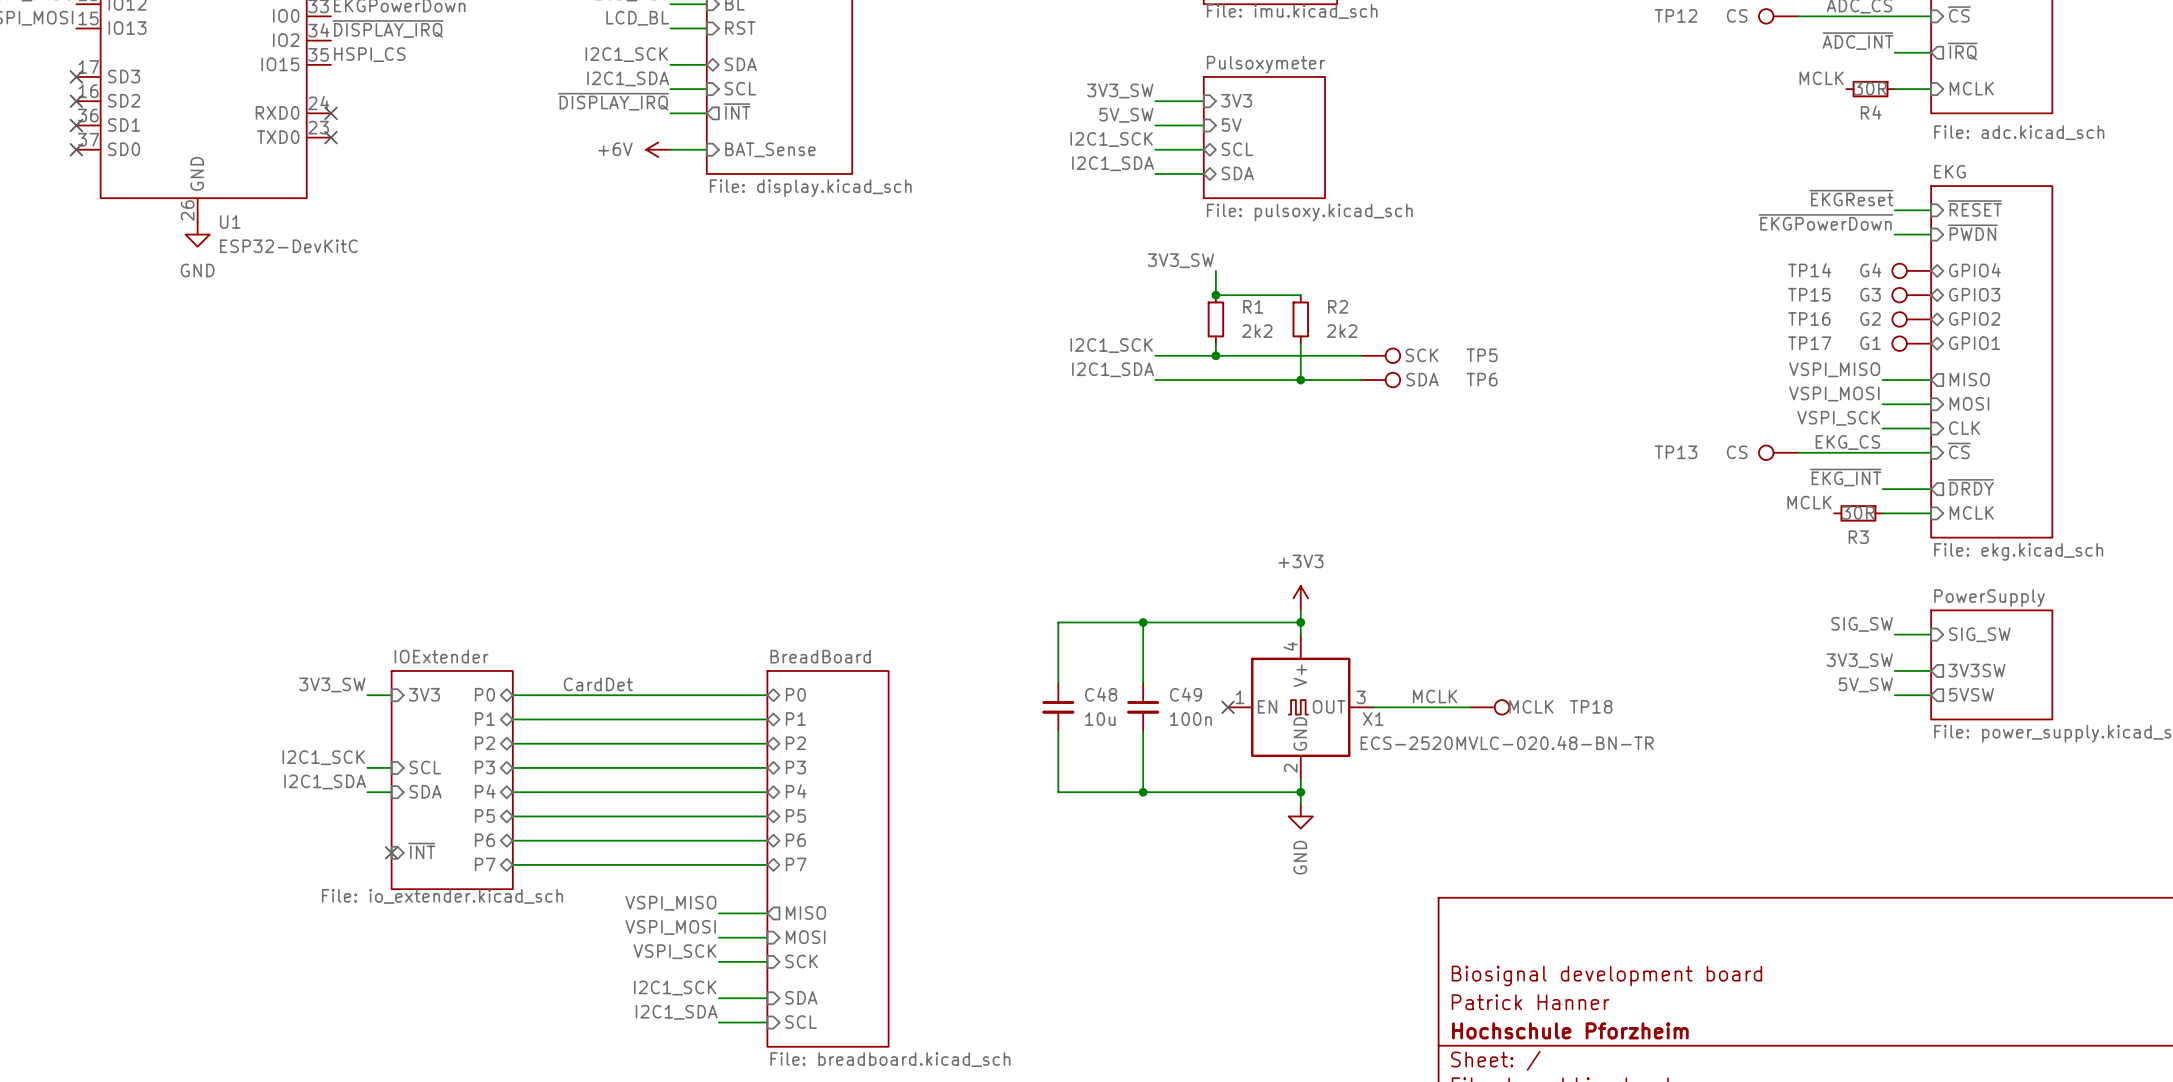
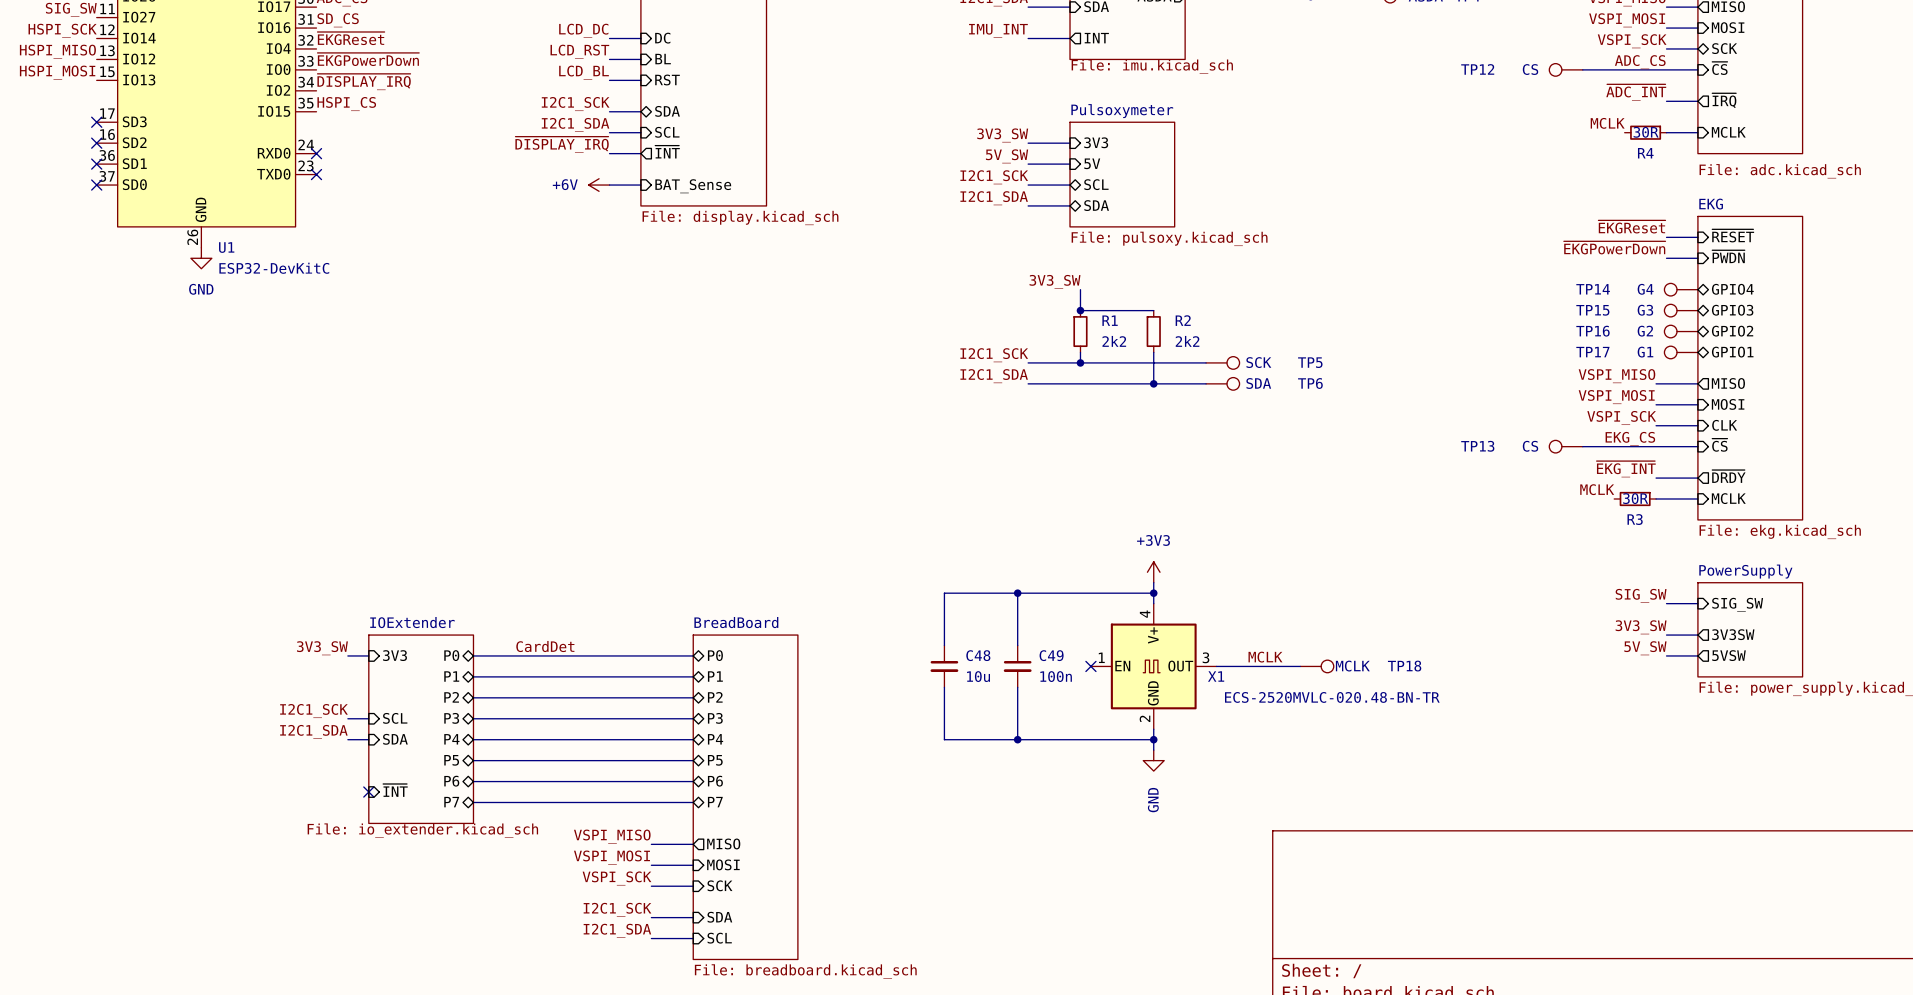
title block: Biosignal development board (1606, 975) -> none
title block: Patrick Hanner (1530, 1002) -> none
title block: Hochschule Pforzheim (1570, 1030) -> none

